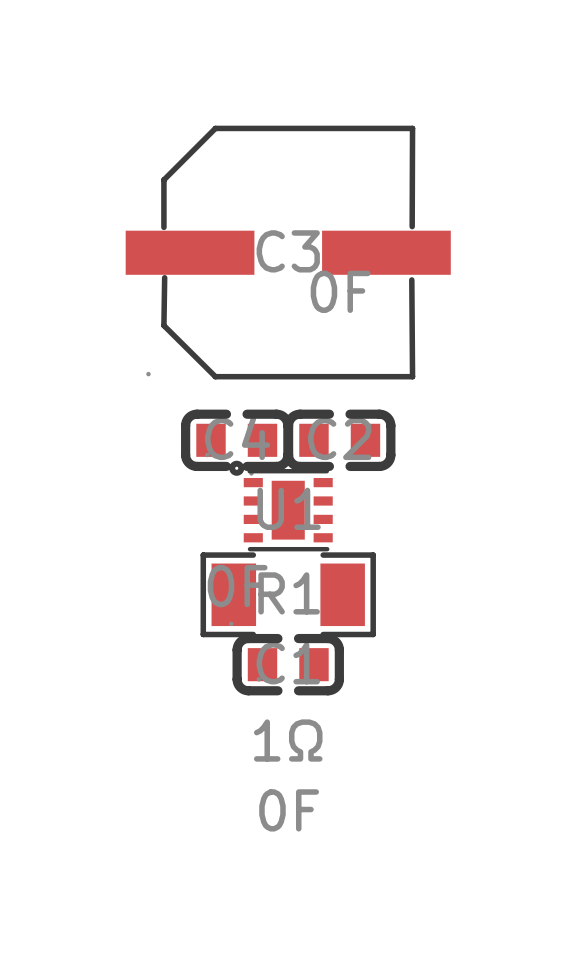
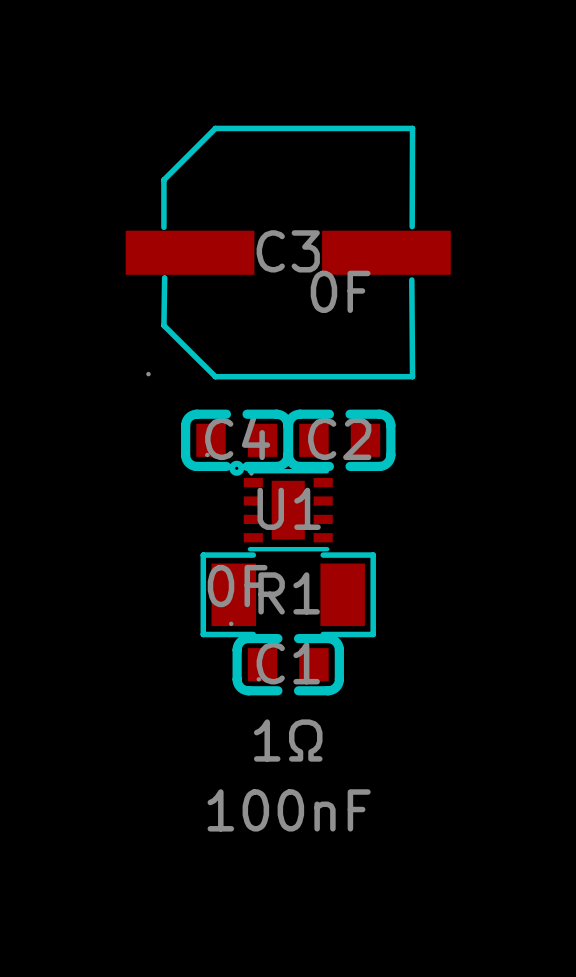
C1 value: 0F (289, 810) -> 100nF (289, 810)

